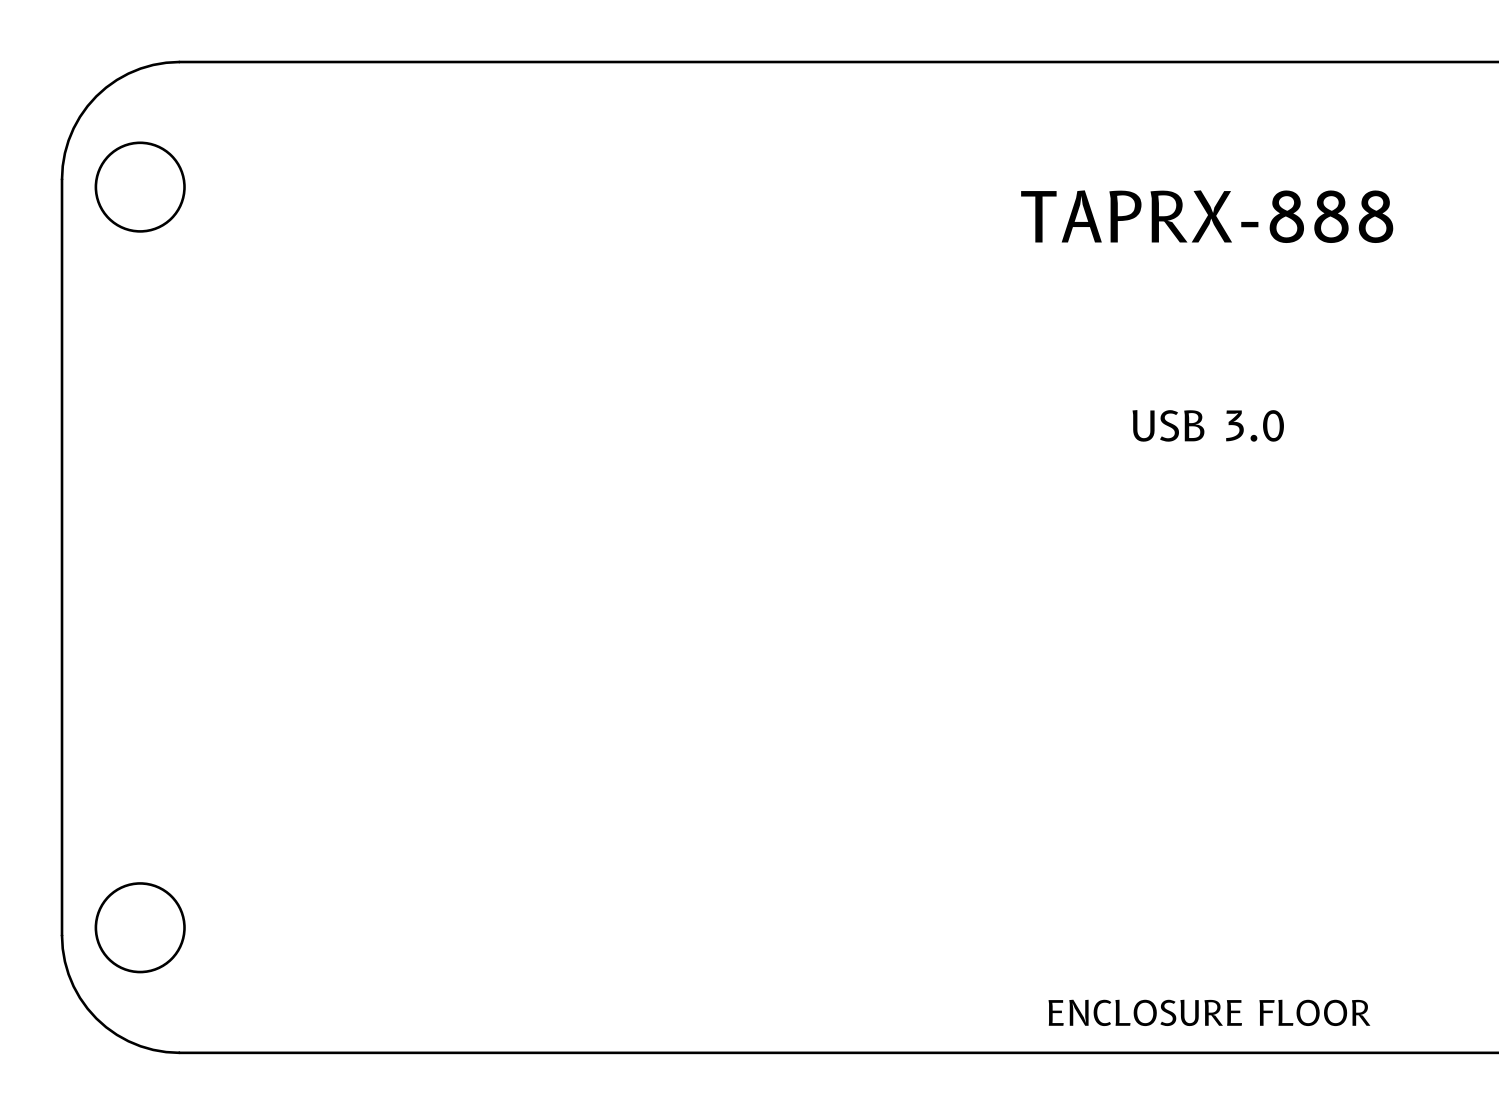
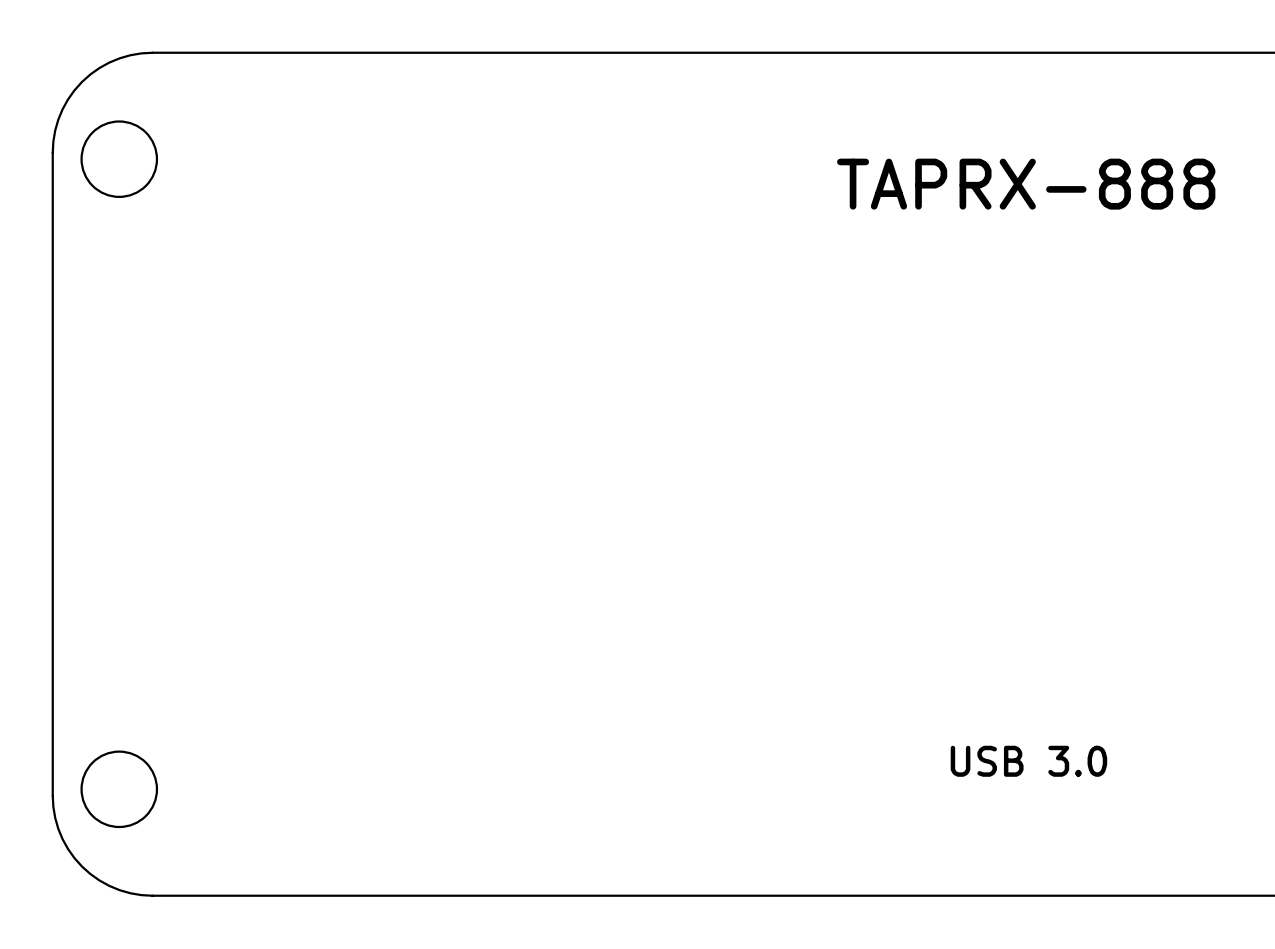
text position: USB 3.0 (1208, 425) -> USB 3.0 (1028, 761)
text: ENCLOSURE FLOOR (1209, 1012) -> none

